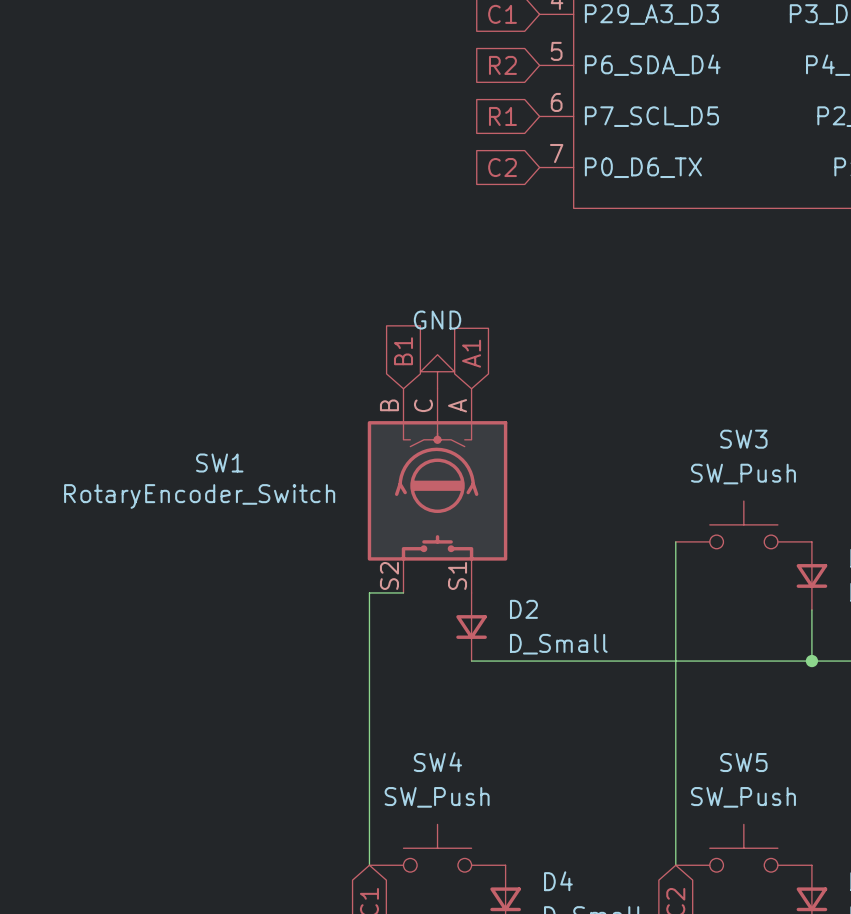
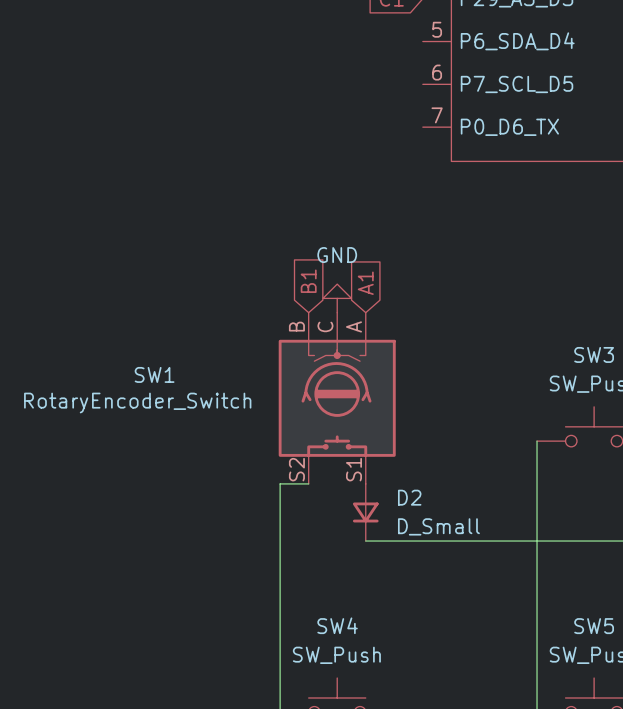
global label: R2 (502, 65) -> none
global label: R1 (502, 116) -> none
global label: C2 (502, 167) -> none

